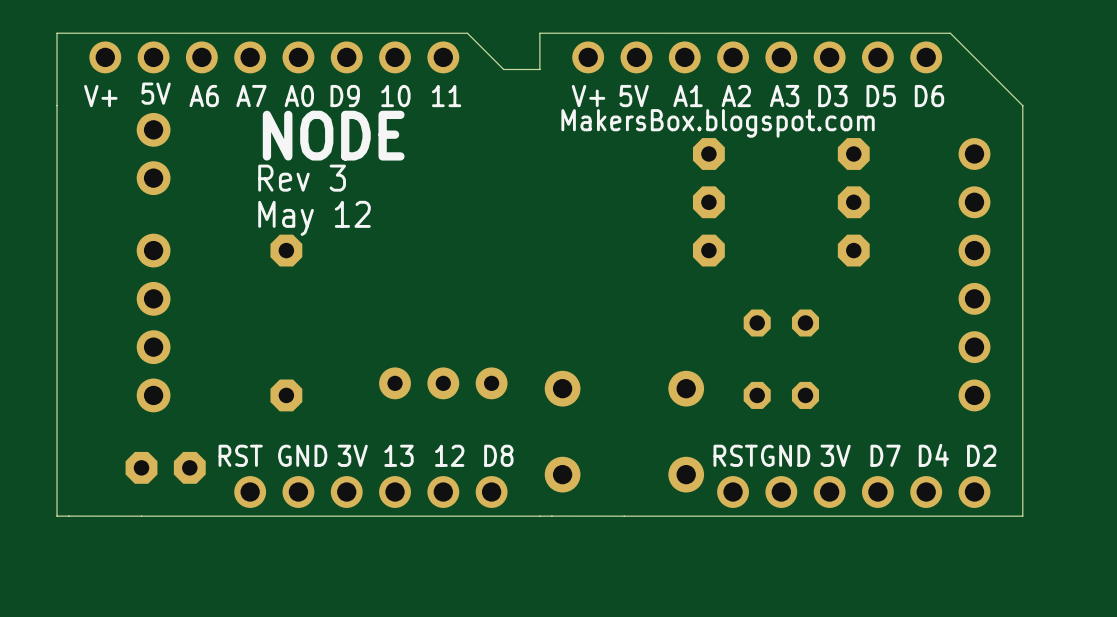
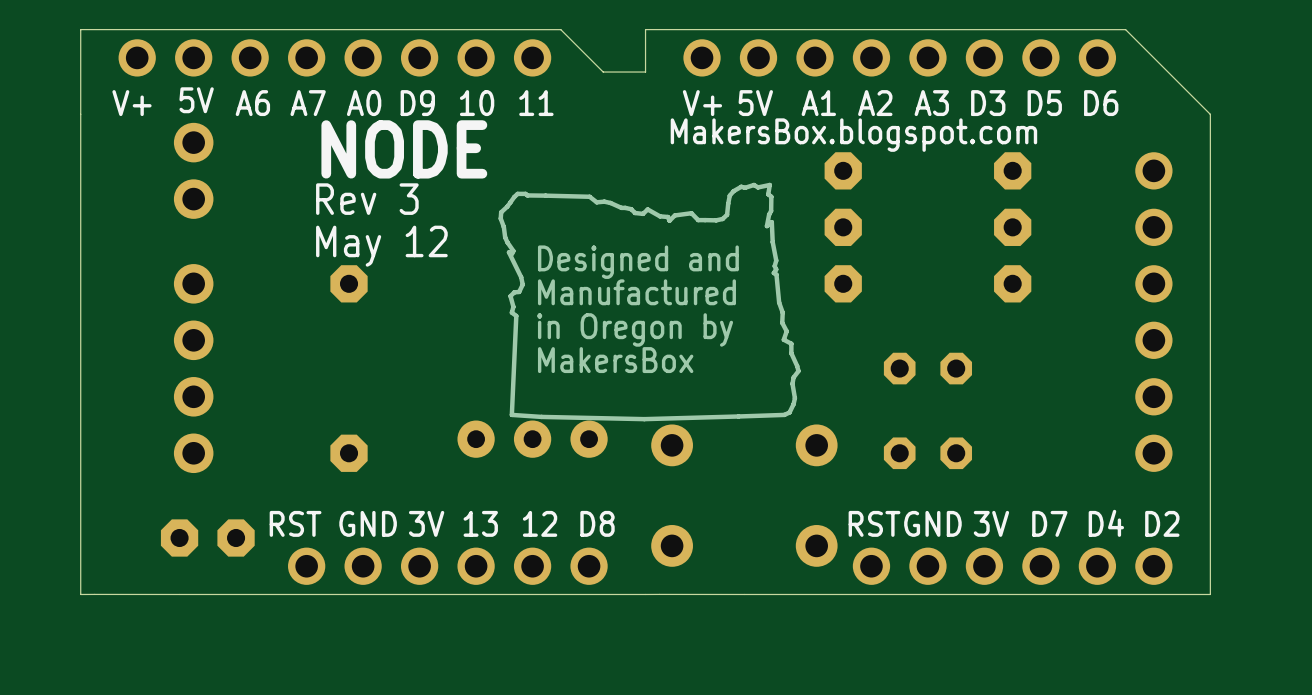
drawing: none -> [498, 182, 801, 422]

